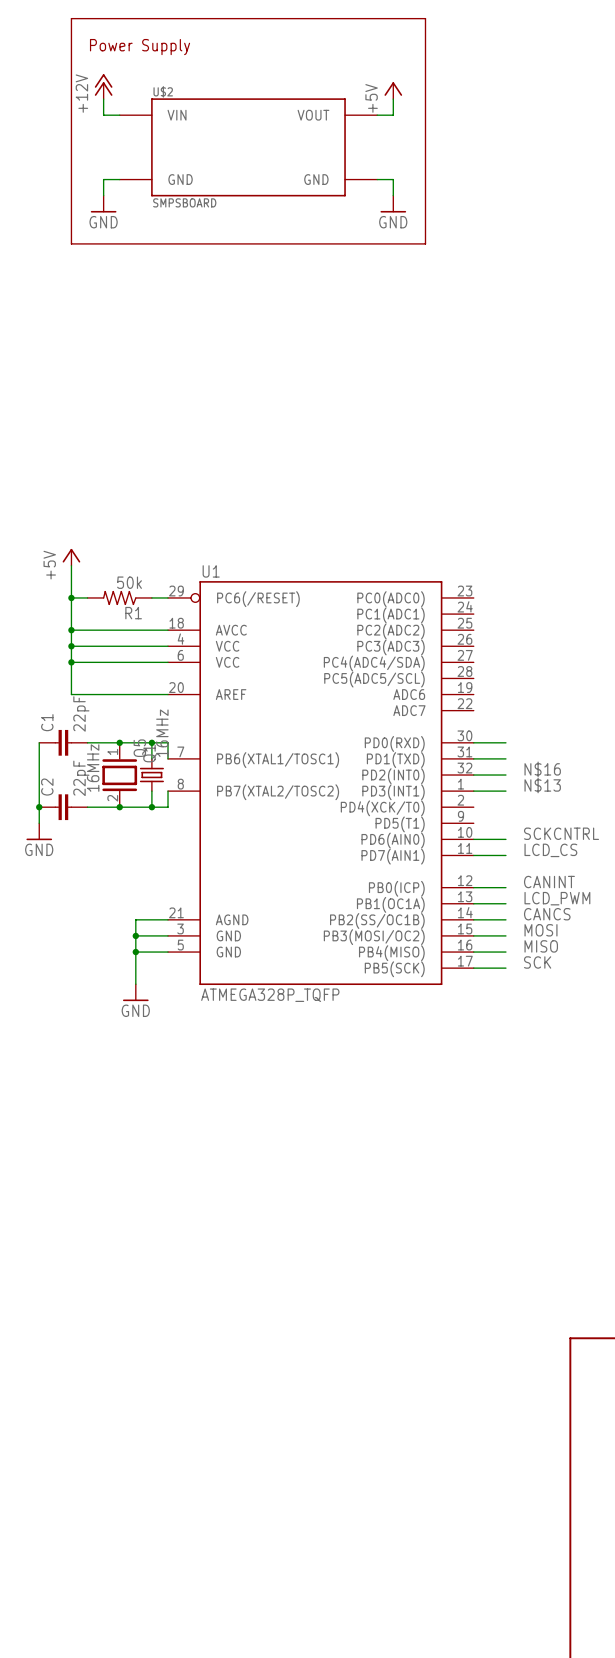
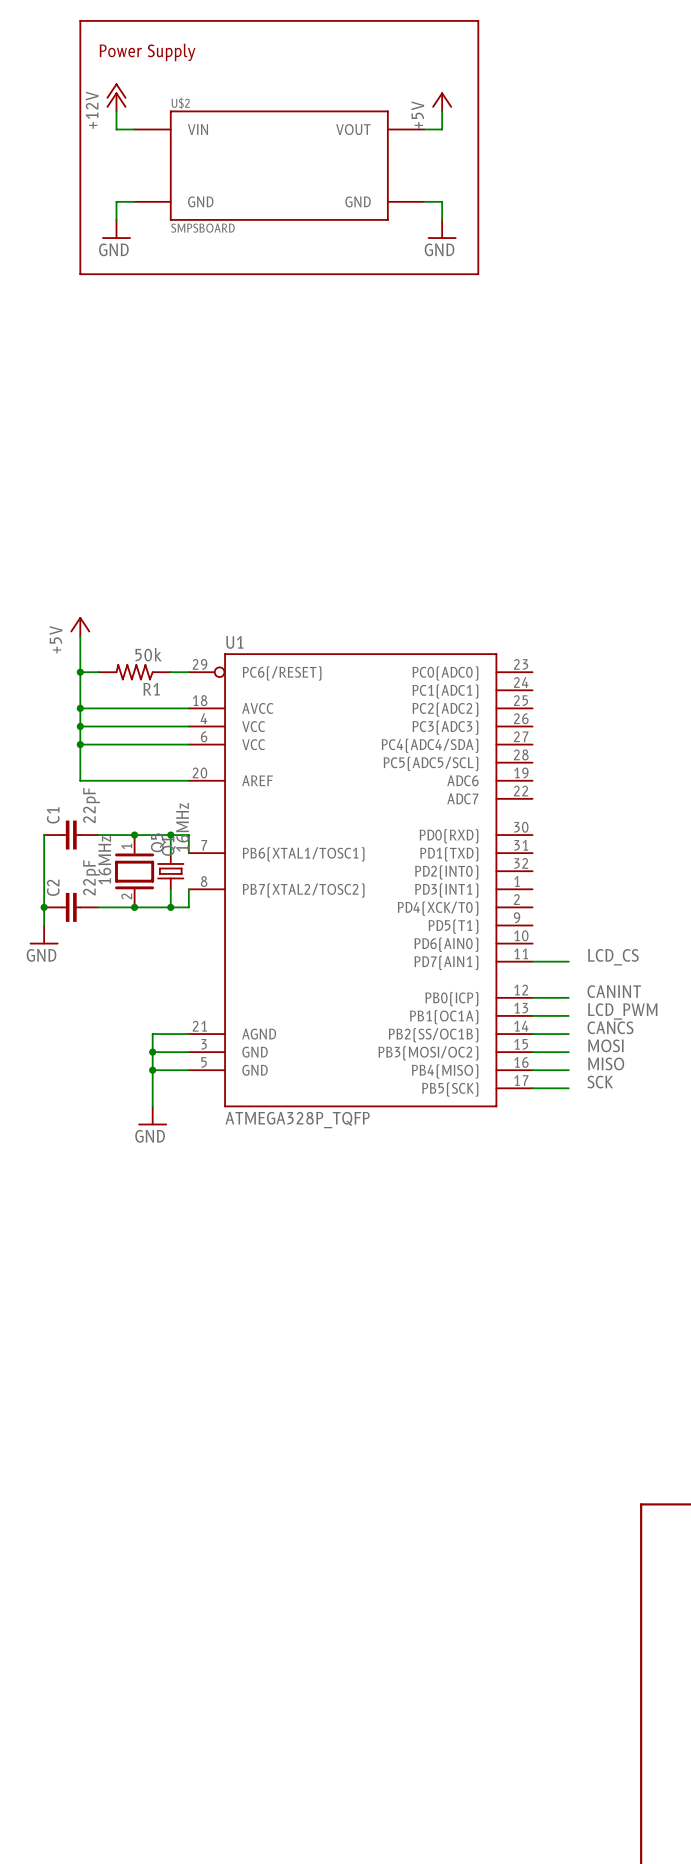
wire: (473, 742) (505, 742) -> none
wire: (473, 758) (505, 758) -> none
label: N$16 (542, 769) -> none
wire: (473, 775) (505, 775) -> none
label: N$13 (542, 785) -> none
wire: (473, 791) (505, 791) -> none
label: SCKCNTRL (561, 833) -> none
wire: (473, 839) (505, 839) -> none

